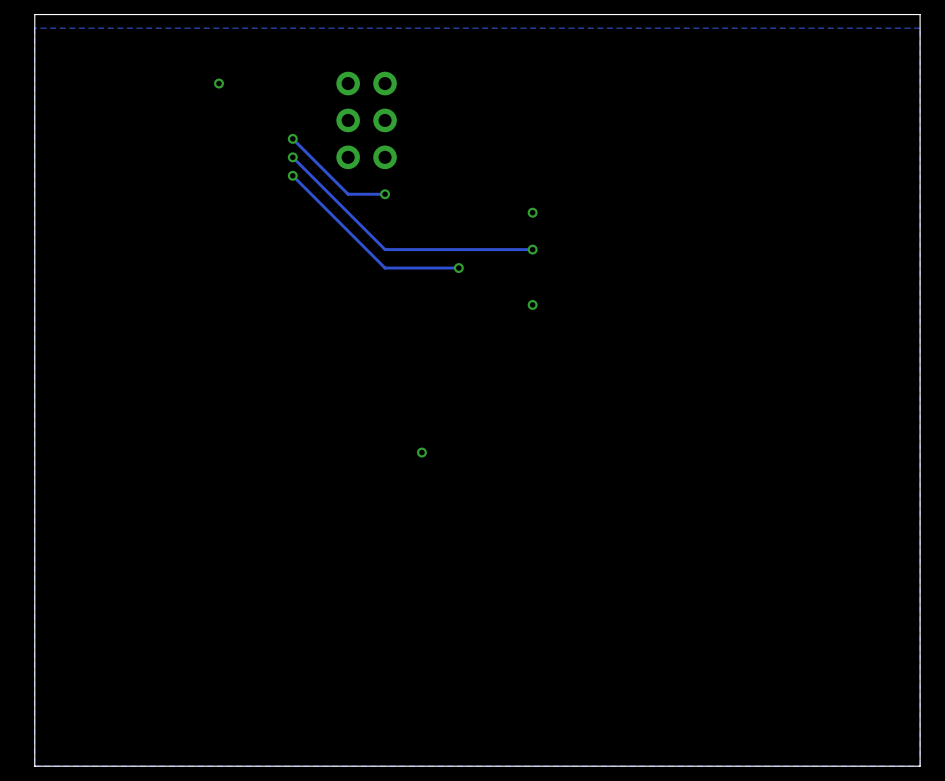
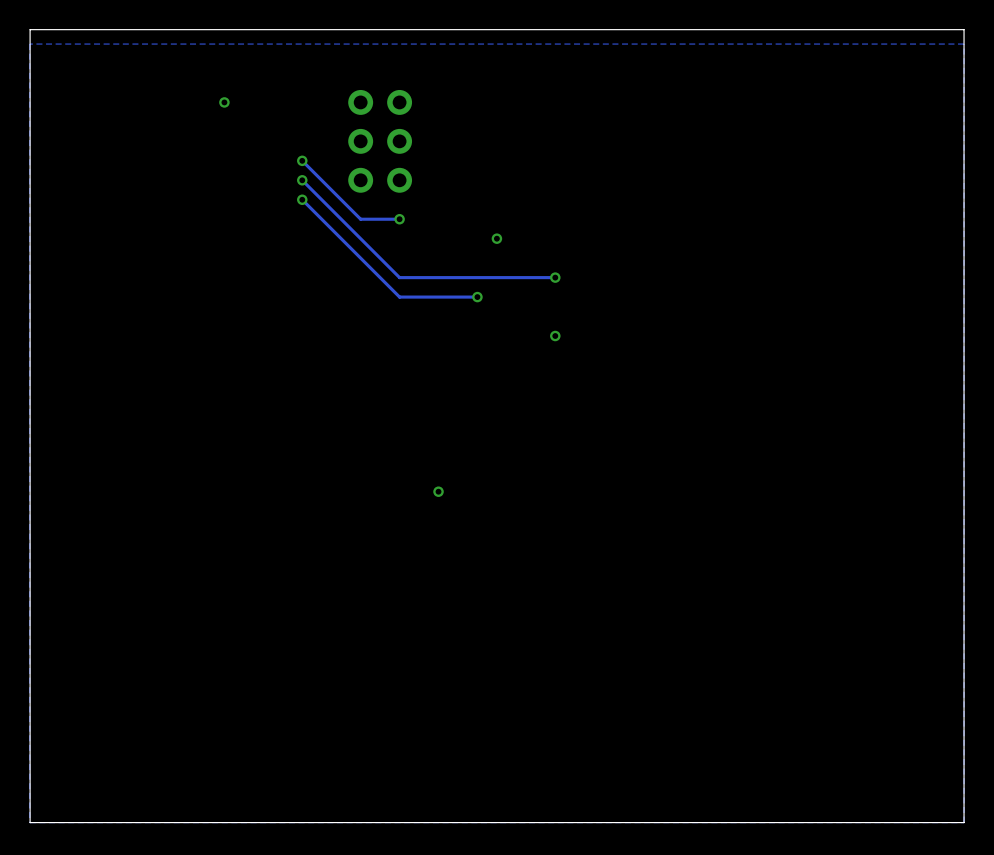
via position: (532, 212) -> (496, 238)

